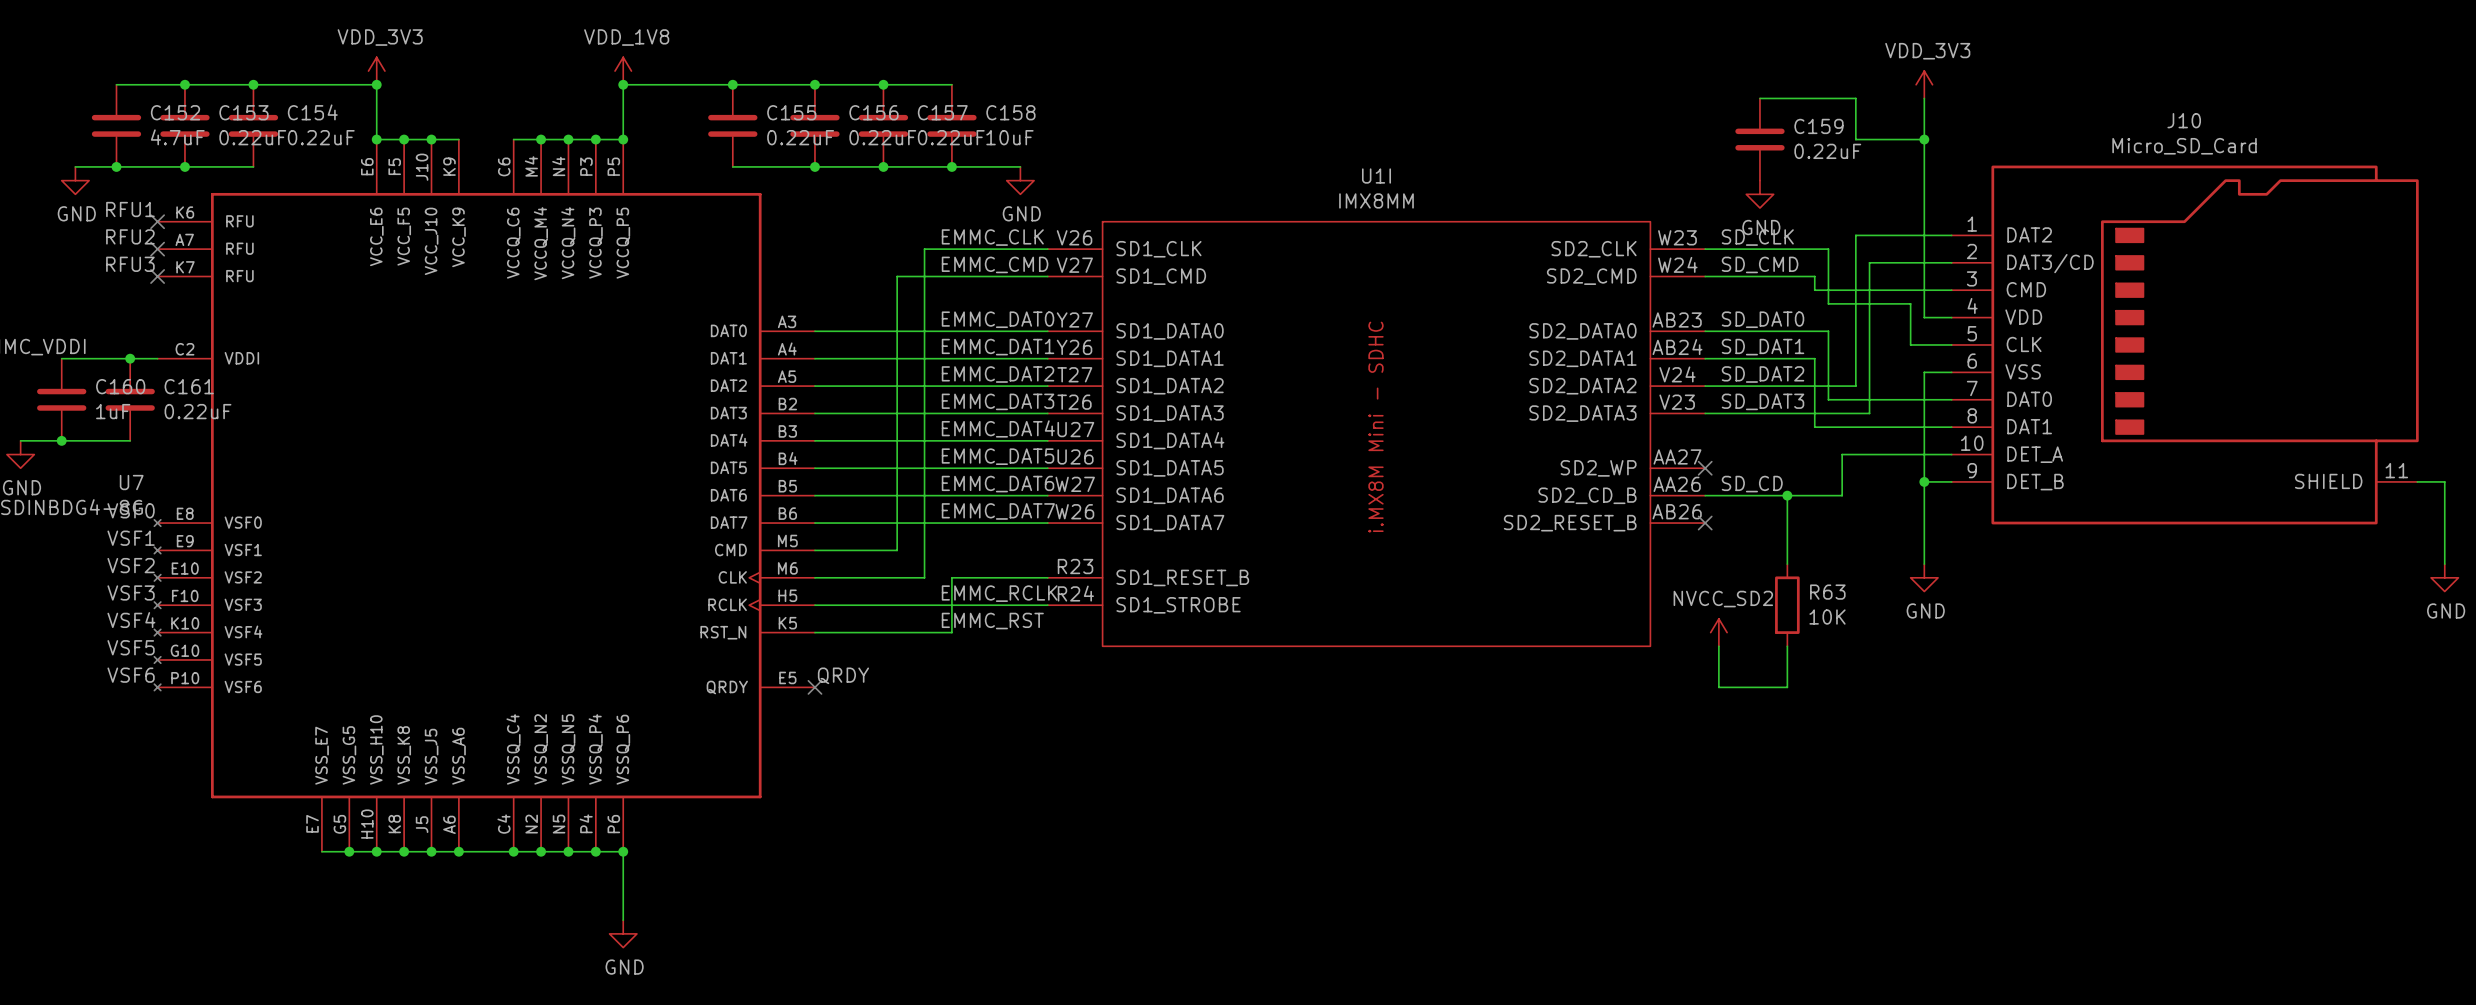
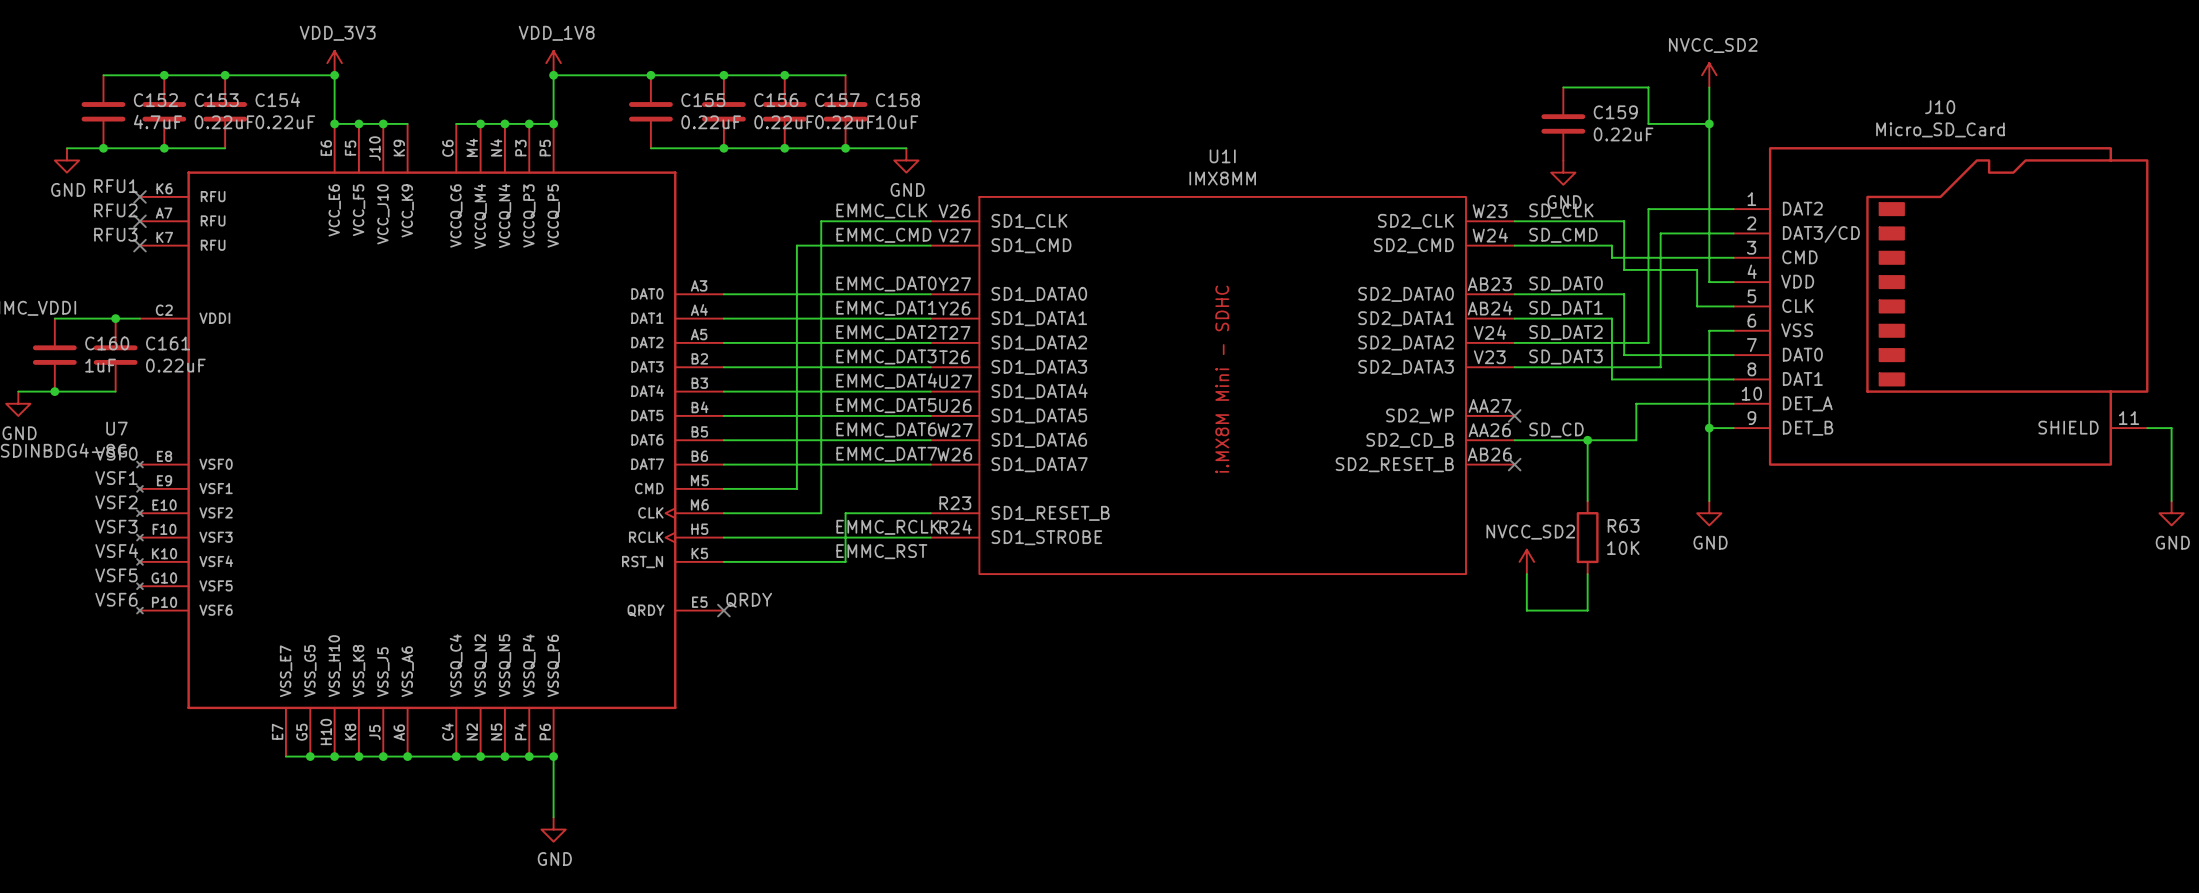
power symbol: VDD_3V3 (1924, 84) -> NVCC_SD2 (1709, 75)

